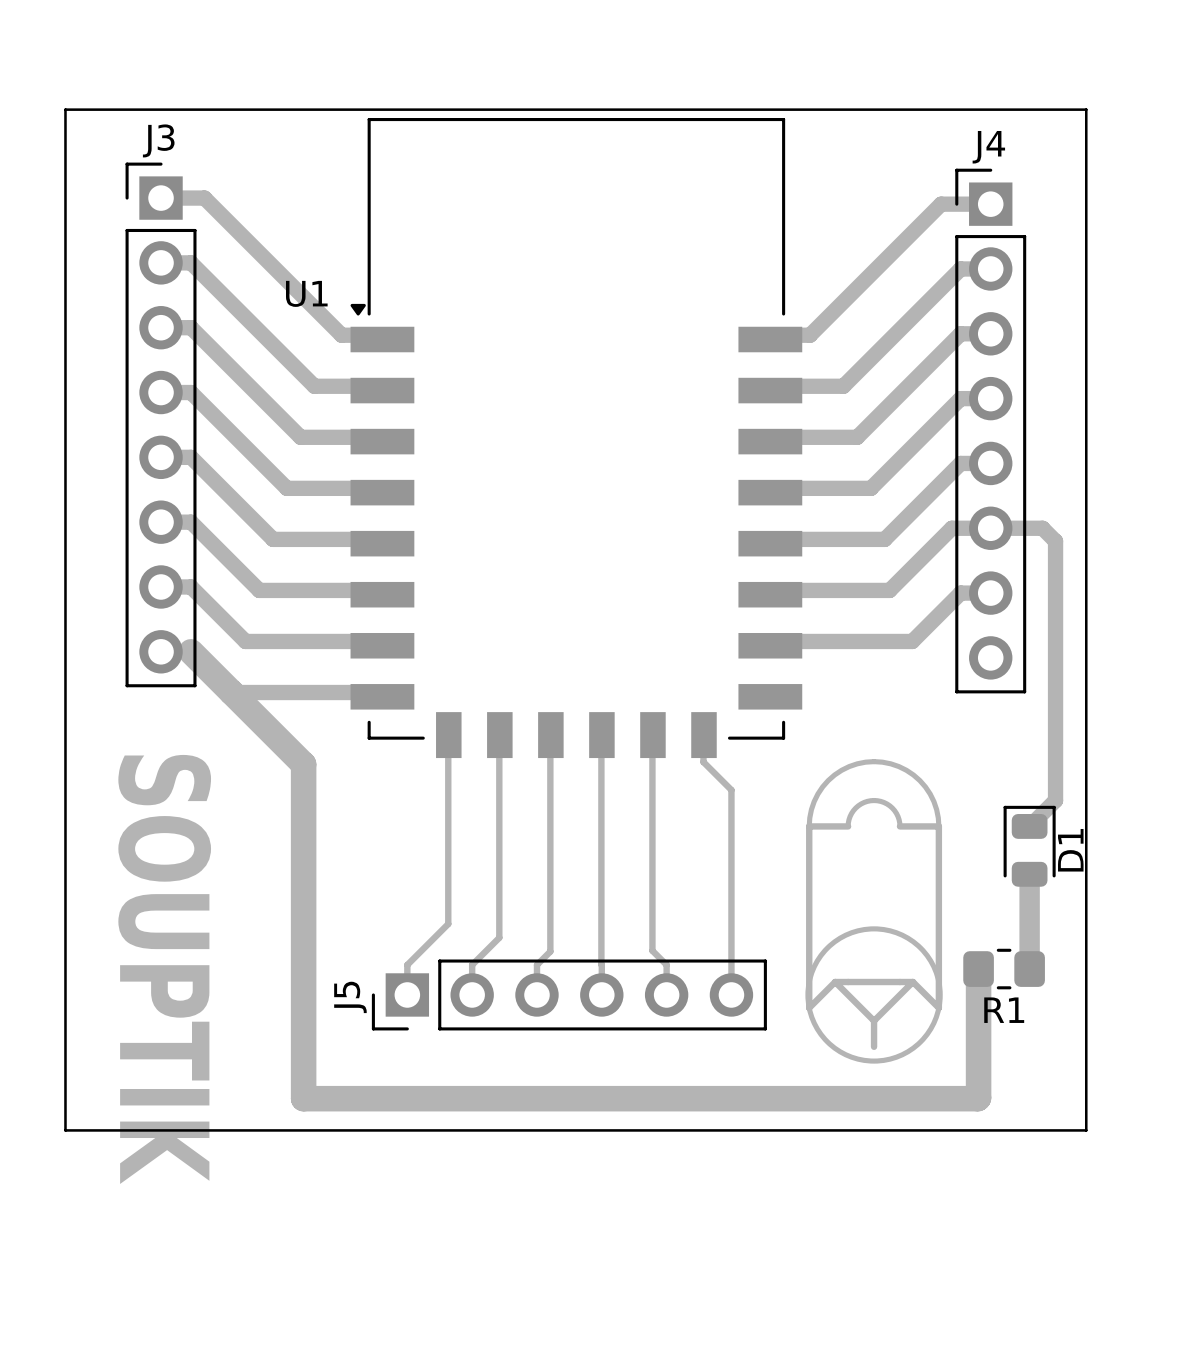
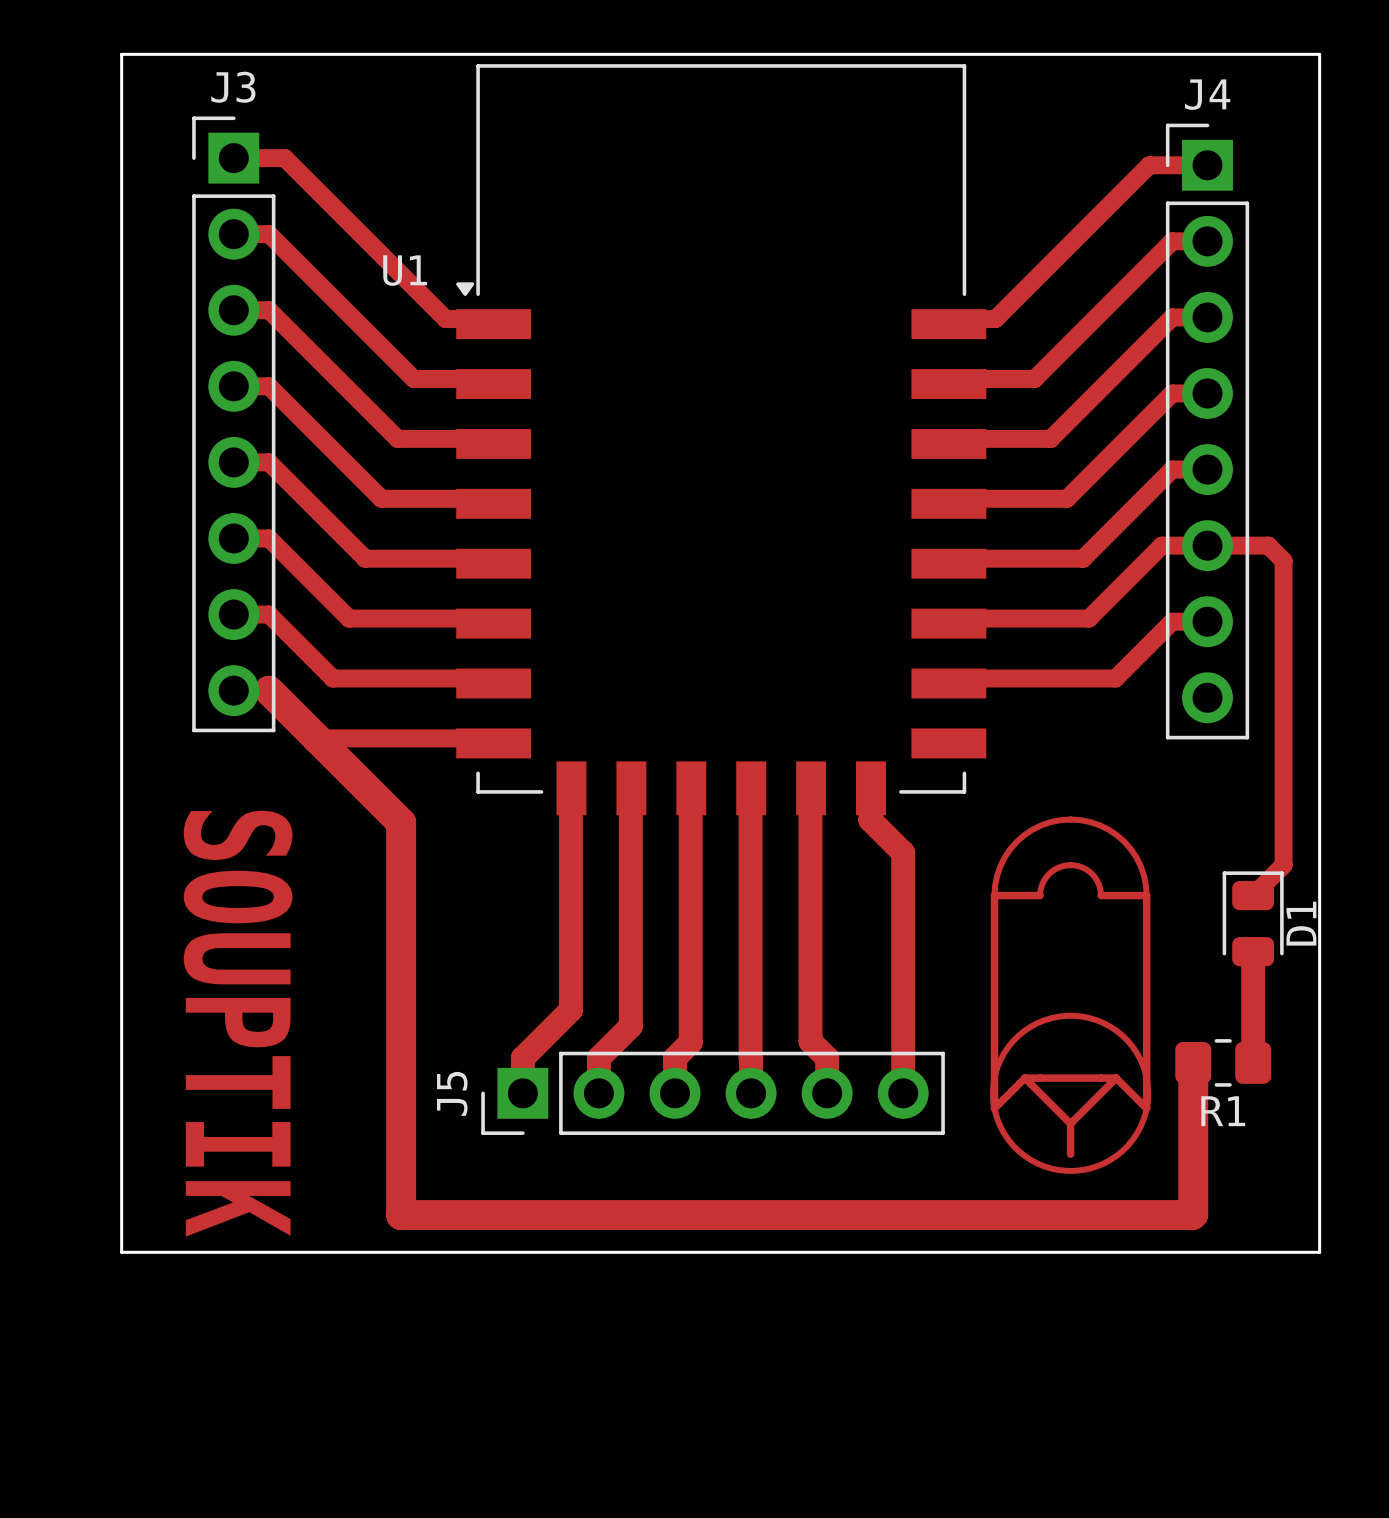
track width: thin (448, 730) (448, 924) (407, 964) (407, 994) -> thick (570, 783) (570, 1010) (522, 1058) (522, 1093)
track width: thin (499, 730) (499, 937) (472, 964) (472, 994) -> thick (630, 783) (630, 1026) (598, 1058) (598, 1093)
track width: thin (550, 730) (550, 951) (536, 964) (536, 994) -> thick (690, 783) (690, 1042) (675, 1058) (675, 1093)
track width: thin (601, 730) (601, 994) -> thick (750, 783) (751, 1093)
track width: thin (652, 730) (652, 950) (666, 964) (666, 994) -> thick (810, 783) (810, 1041) (827, 1058) (827, 1093)
track width: thin (703, 730) (703, 762) (731, 790) (731, 994) -> thick (870, 783) (870, 820) (903, 852) (903, 1093)

